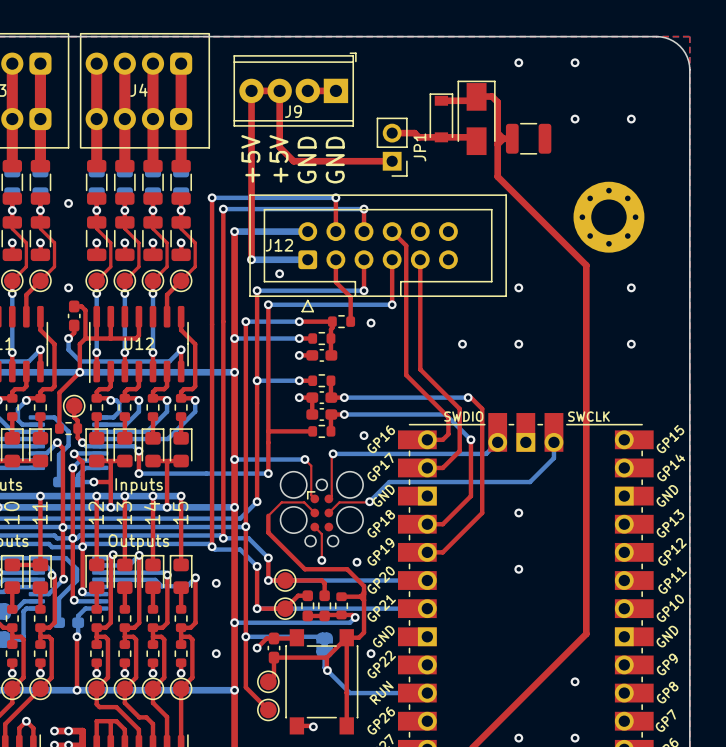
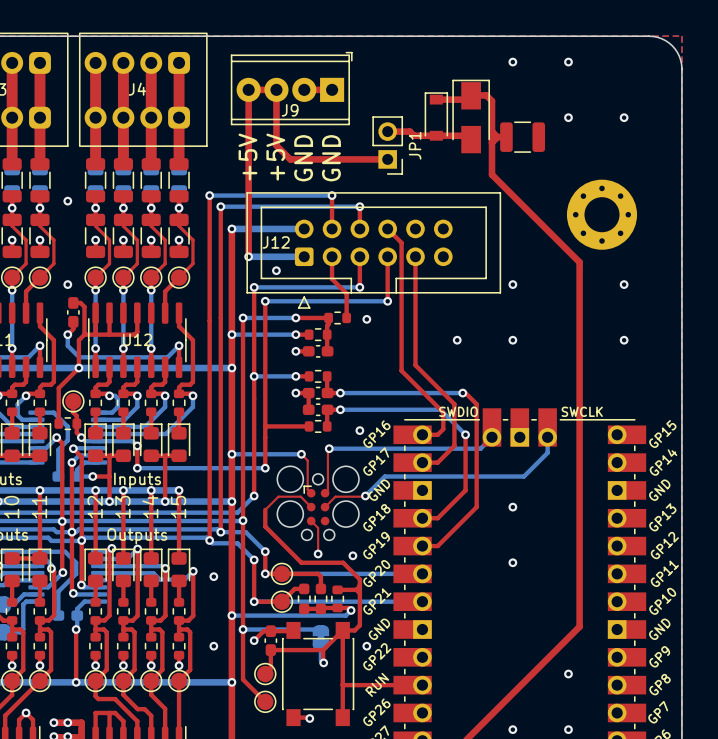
bottom track: (327, 670) (349, 693) (427, 693) -> none
top track: none -> (343, 685) (422, 685)

